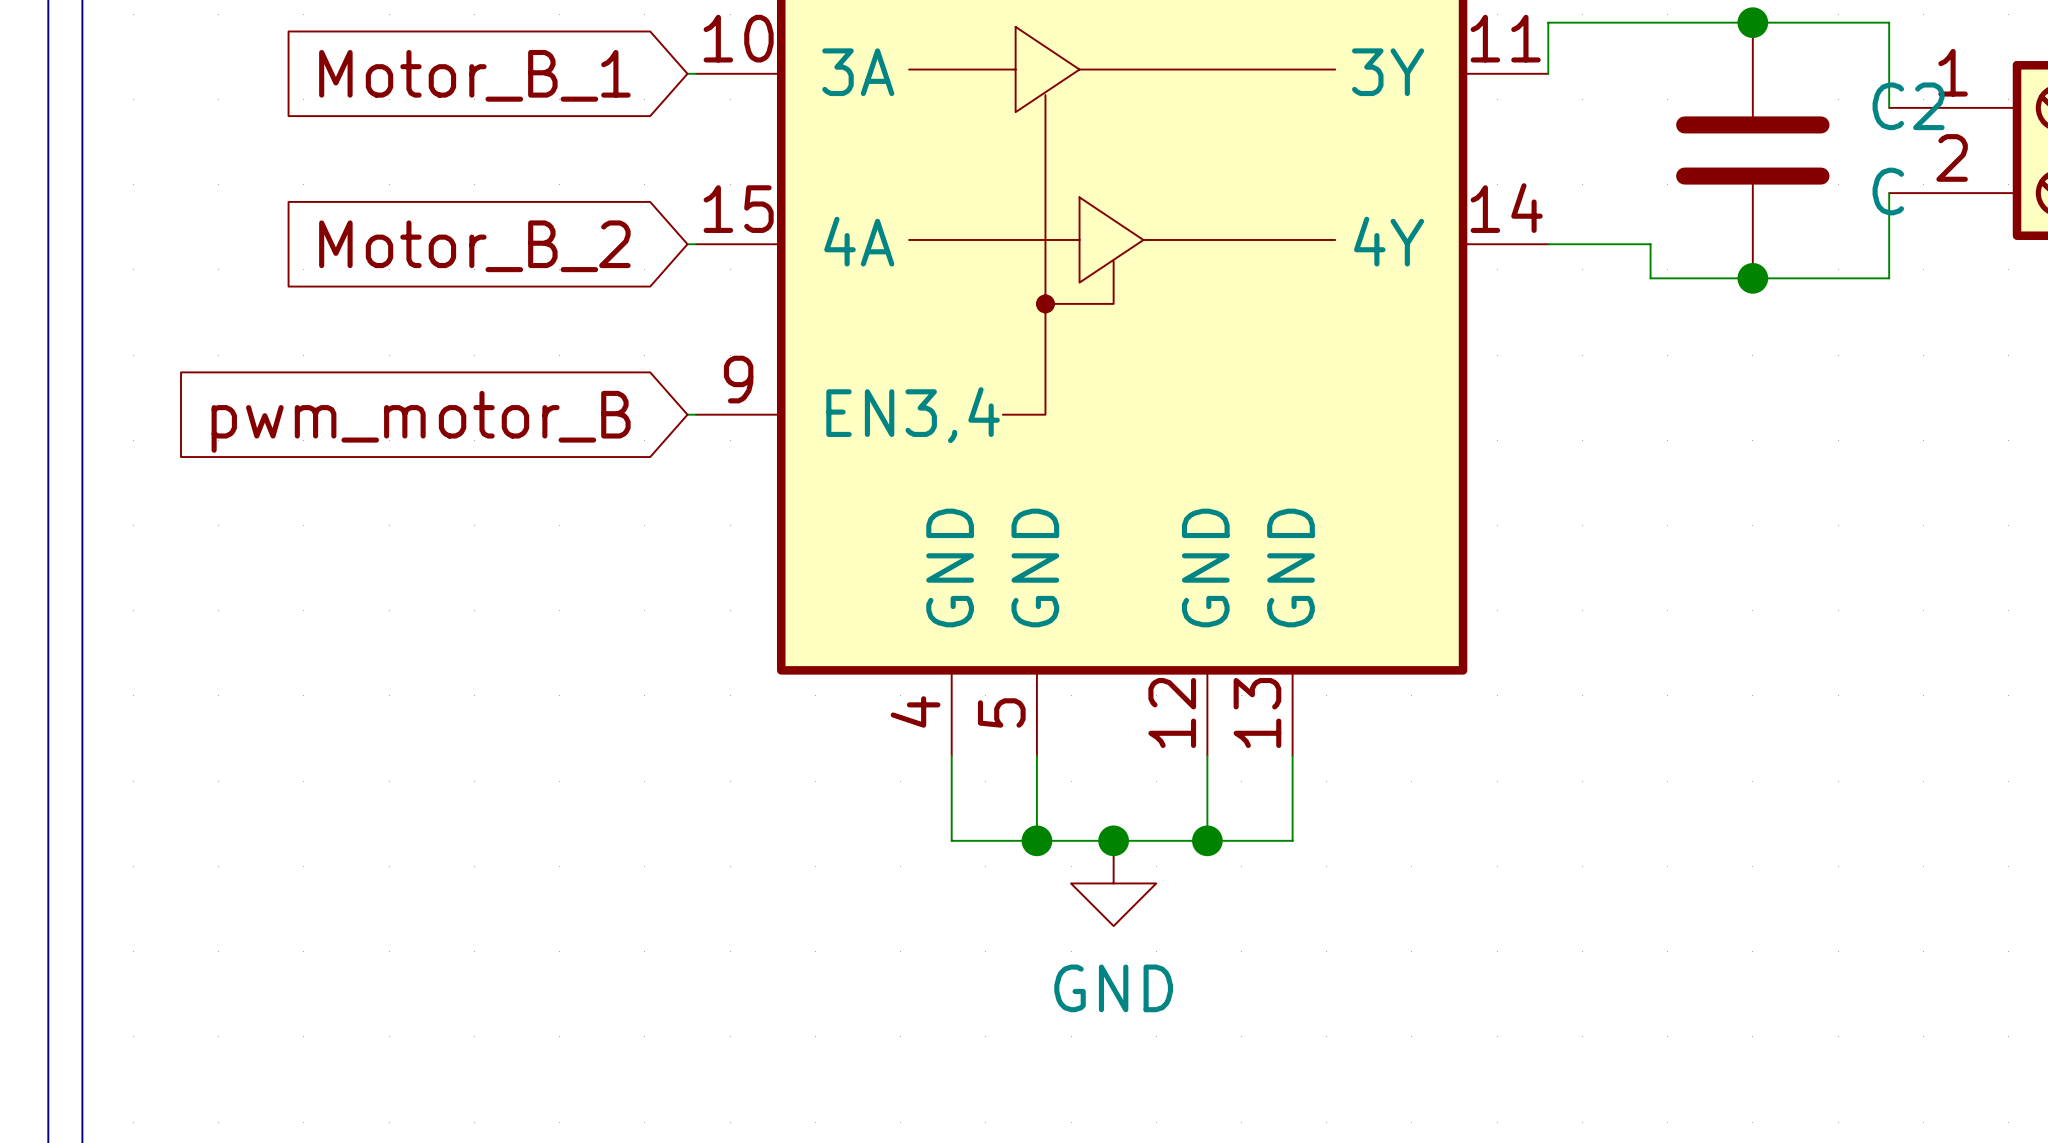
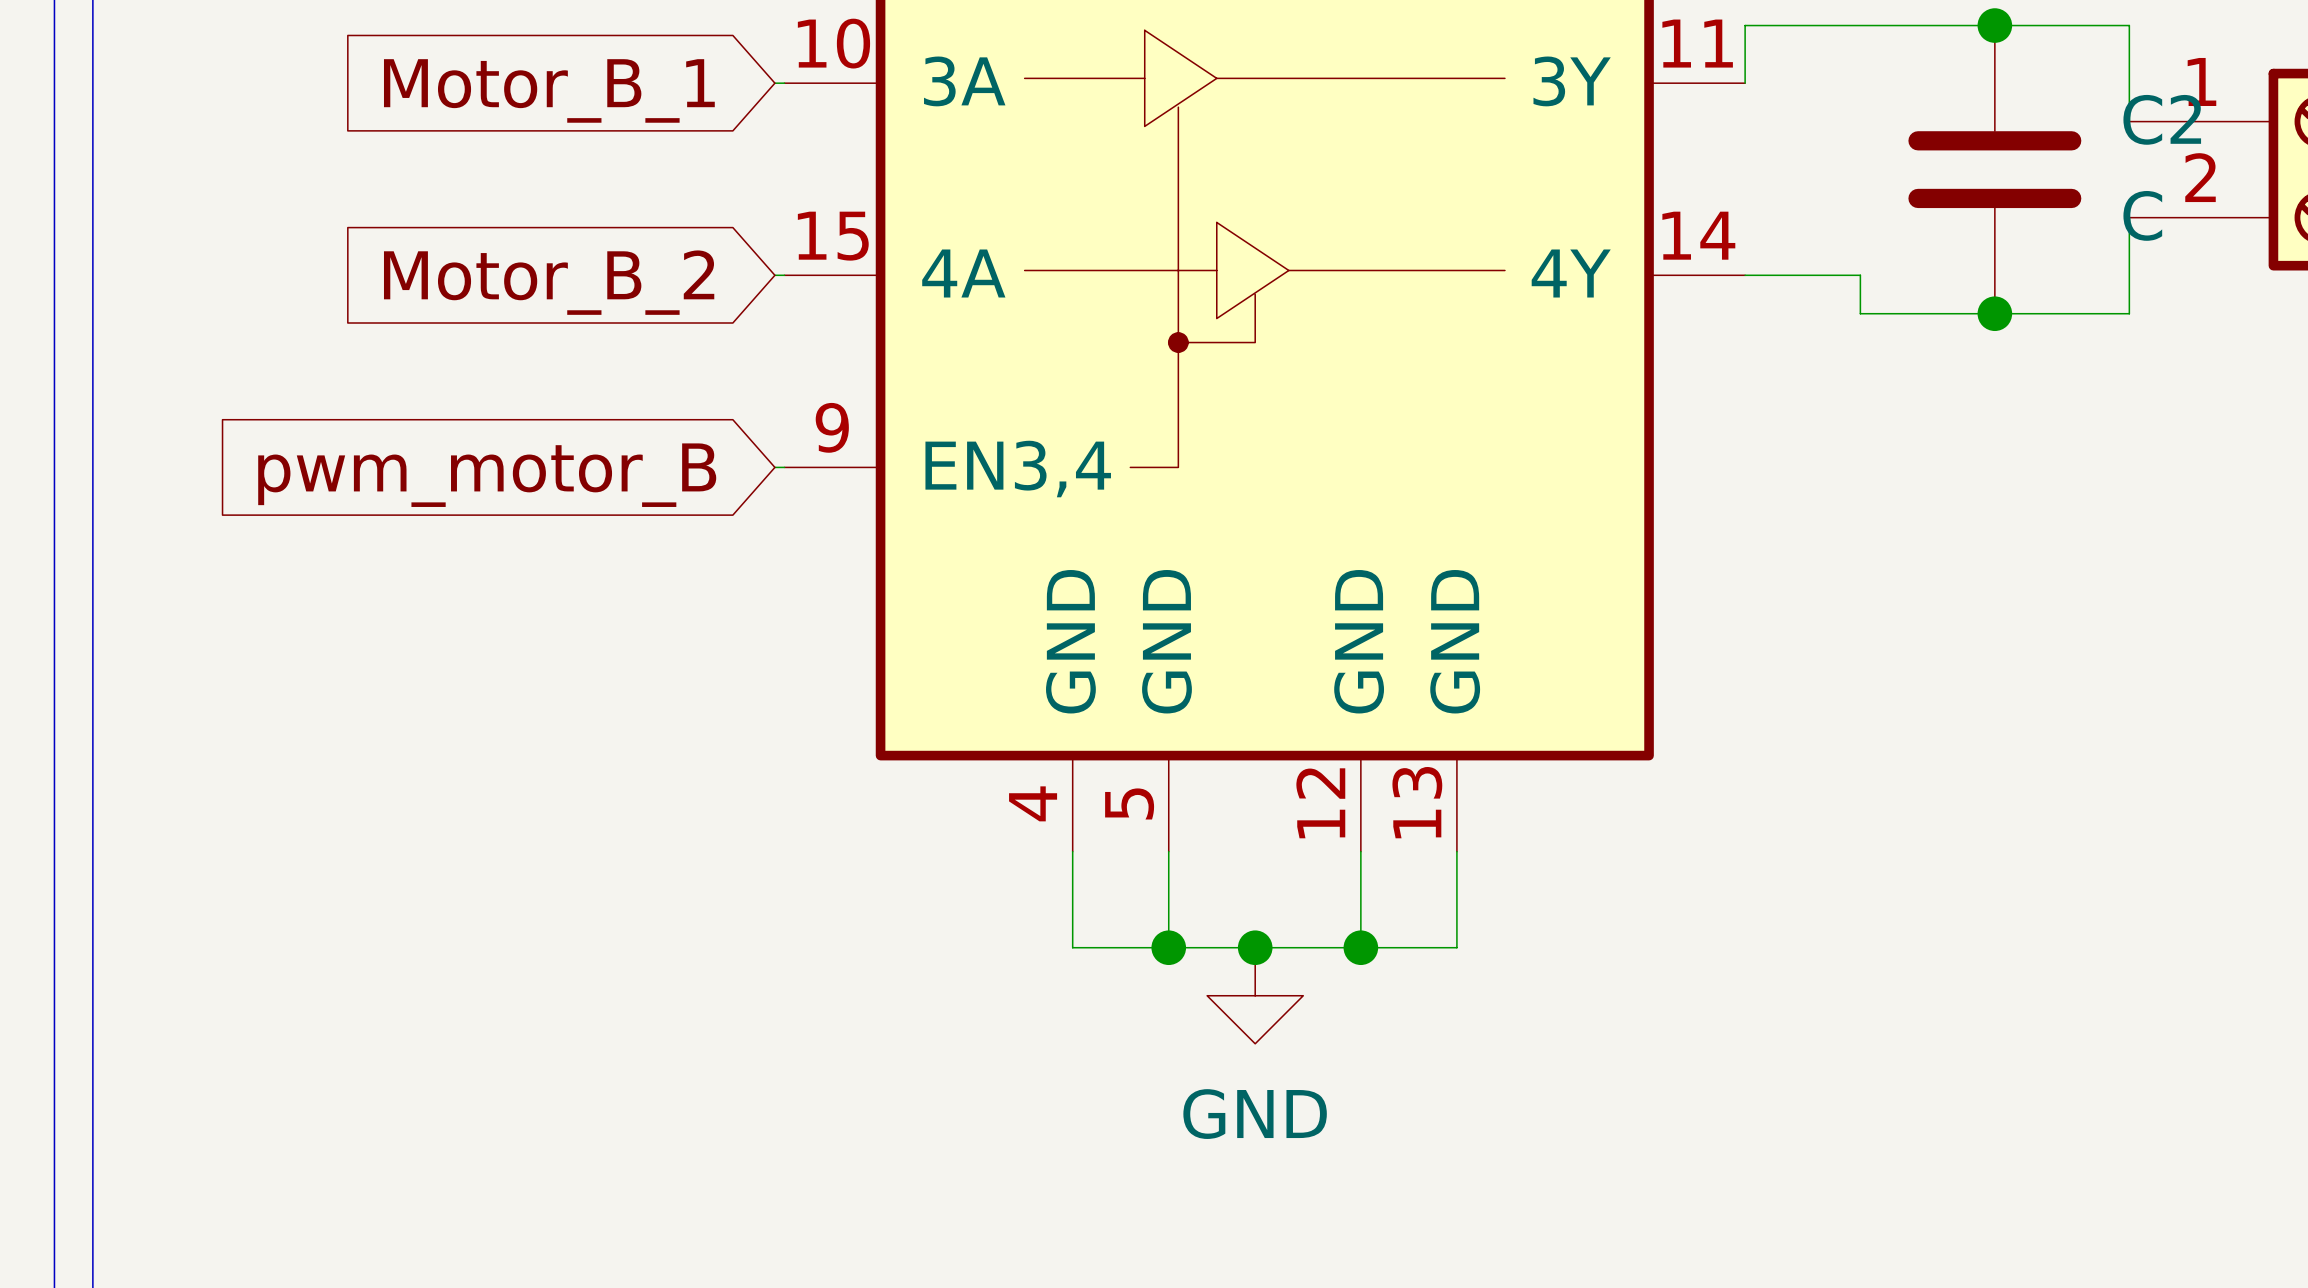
junction position: (1752, 22) -> (1994, 25)
C2 position: (1752, 150) -> (1994, 169)
junction position: (1752, 278) -> (1994, 313)

